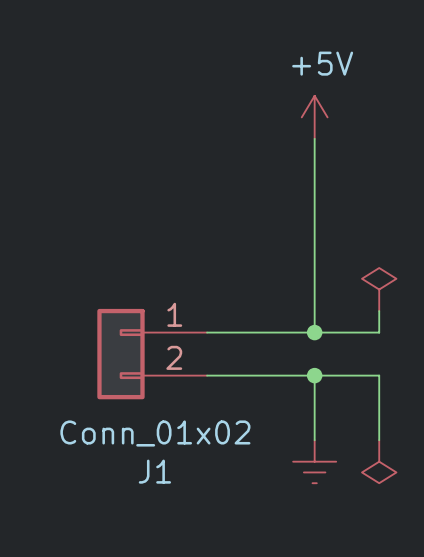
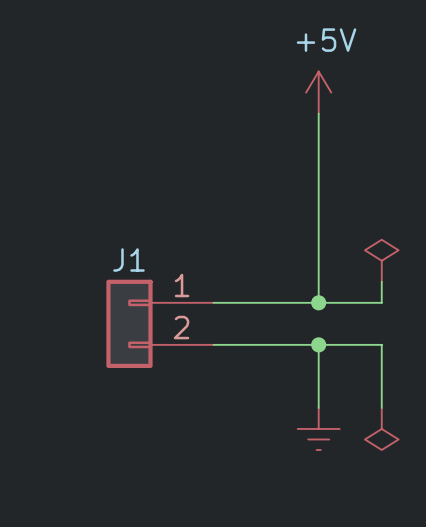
J1 value: Conn_01x02 (155, 433) -> none
J1 name position: J1 (154, 471) -> J1 (128, 259)

